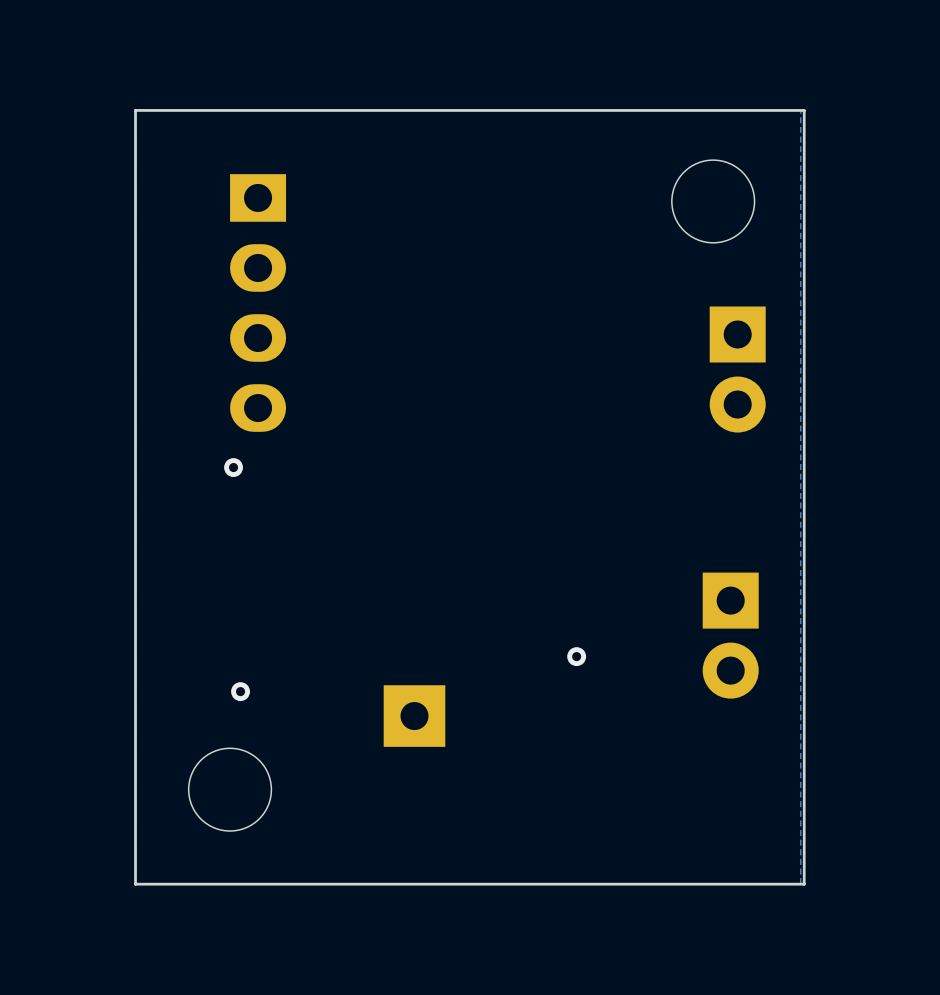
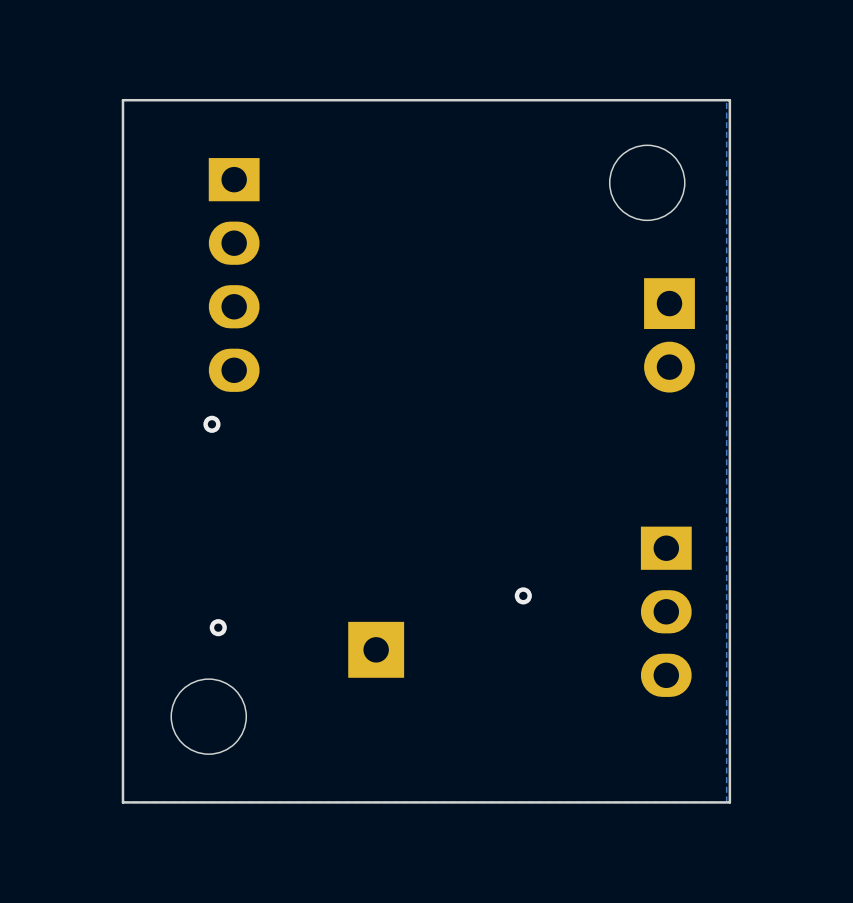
part: (730, 635) -> none
part: none -> (666, 611)

